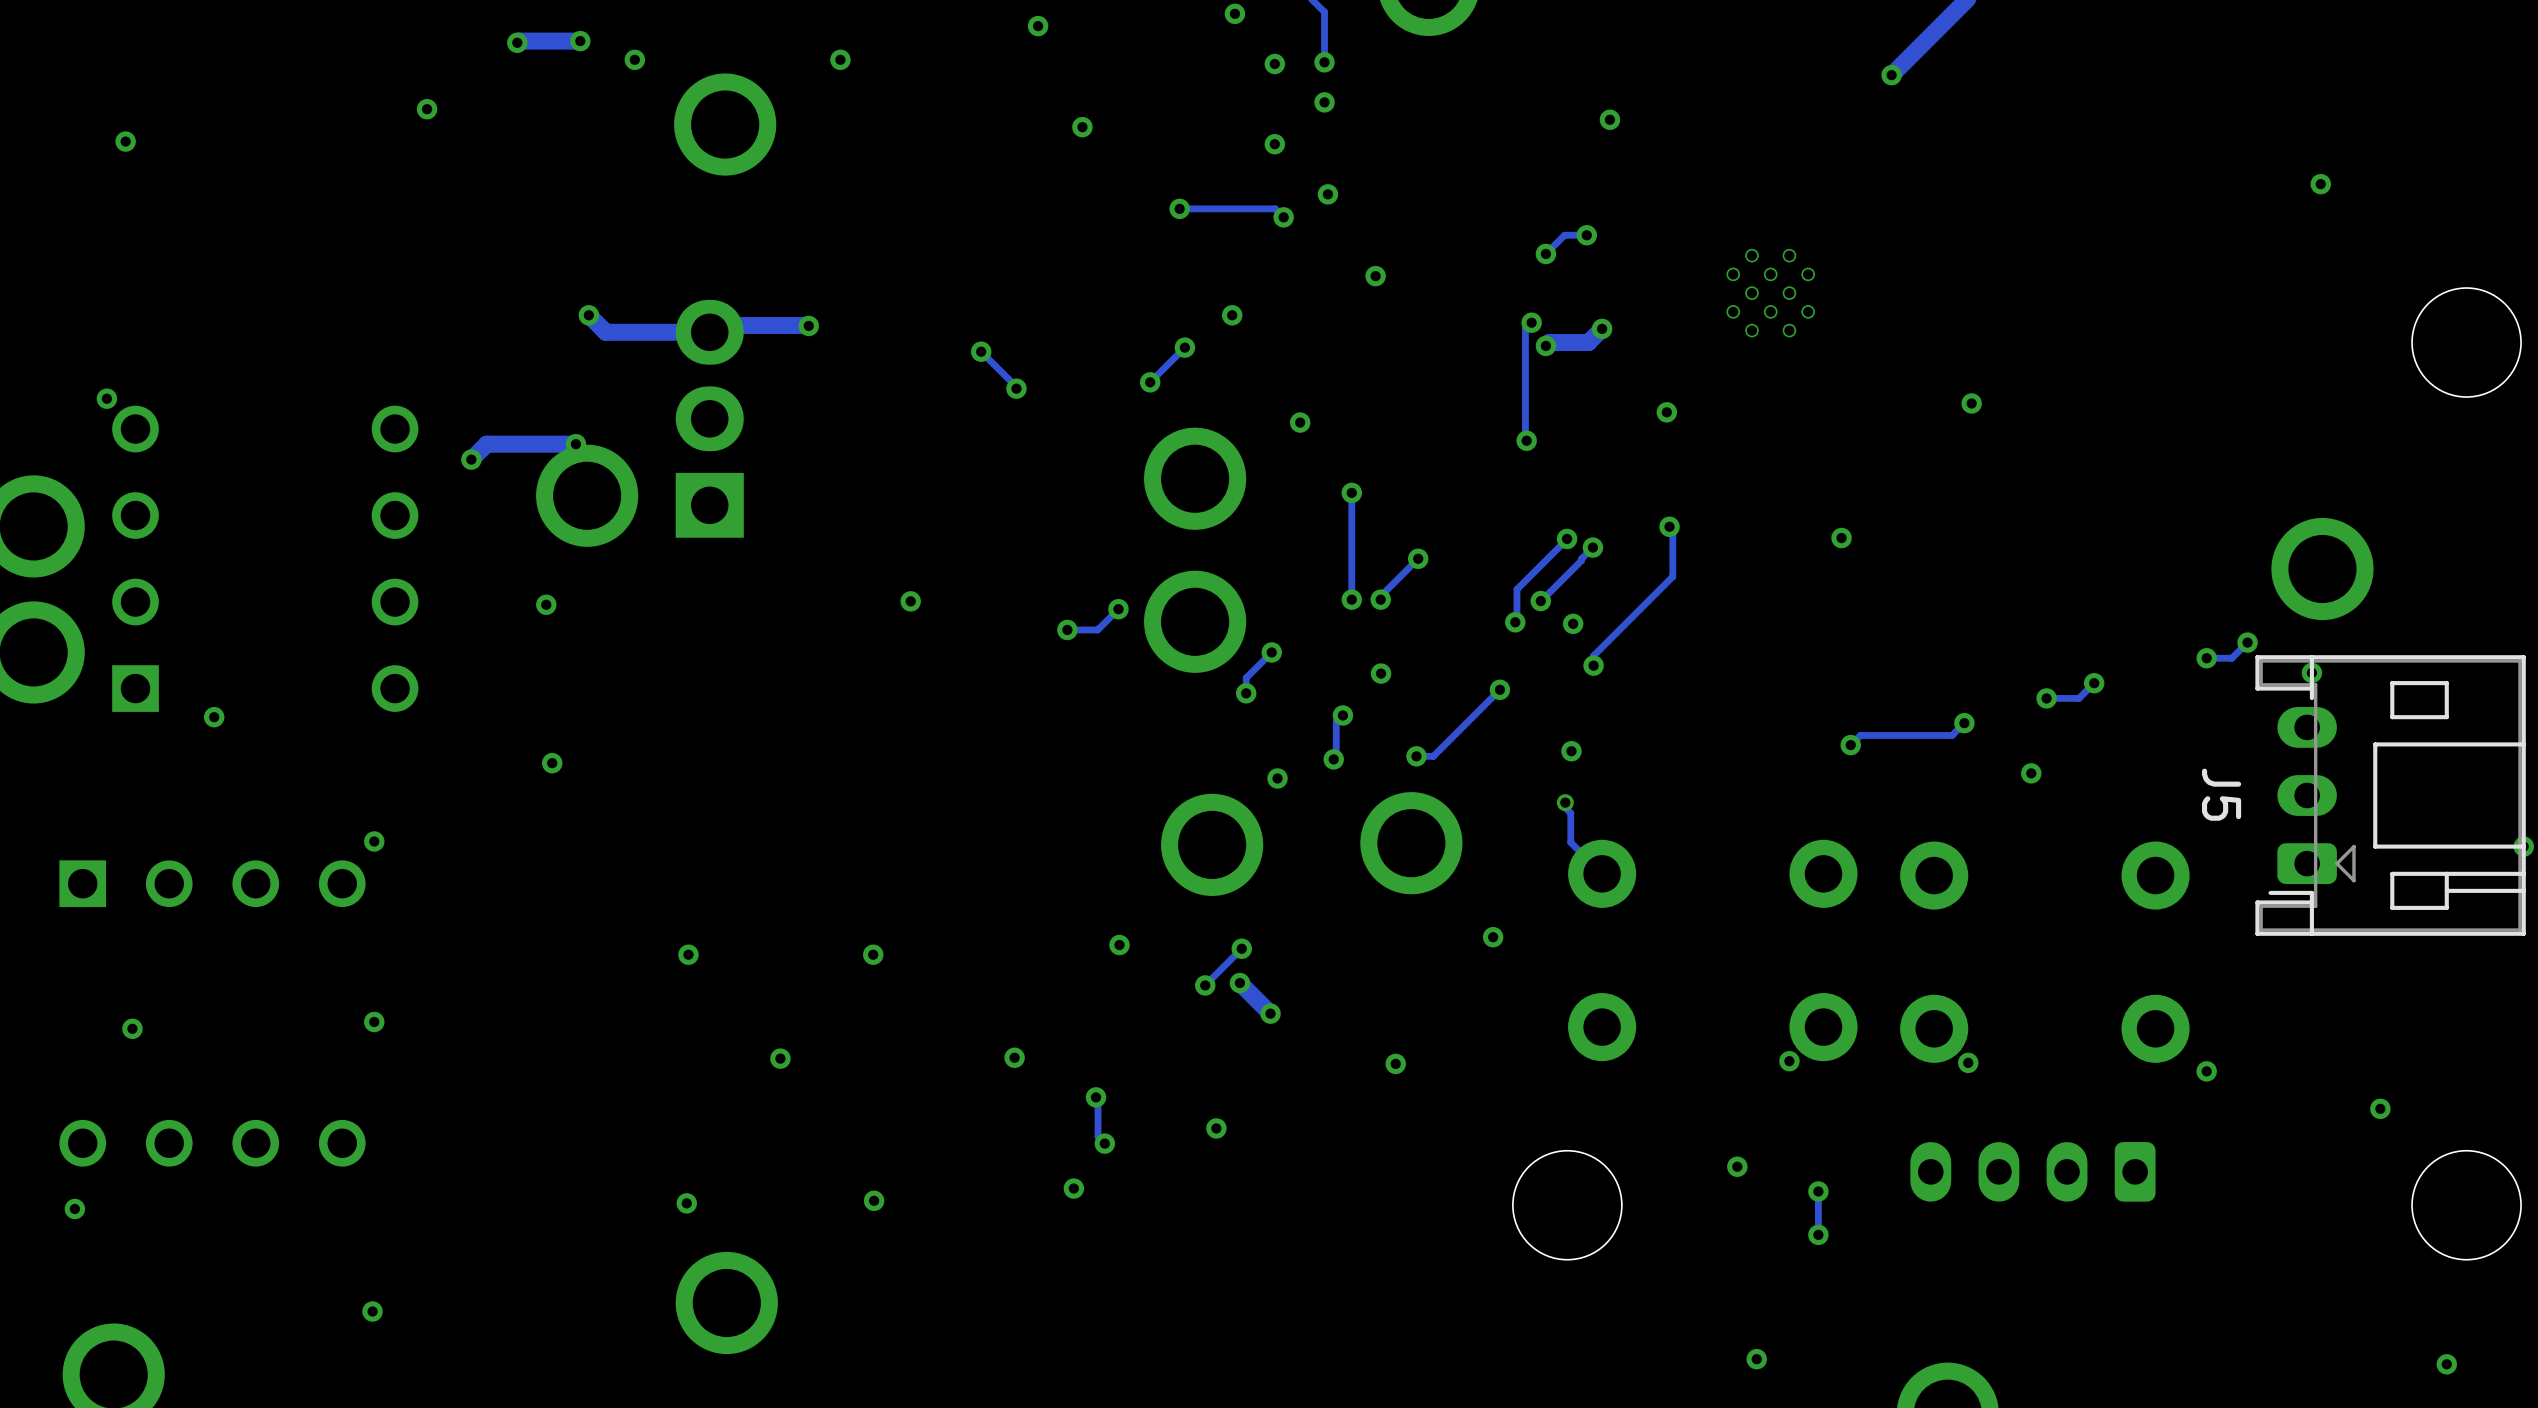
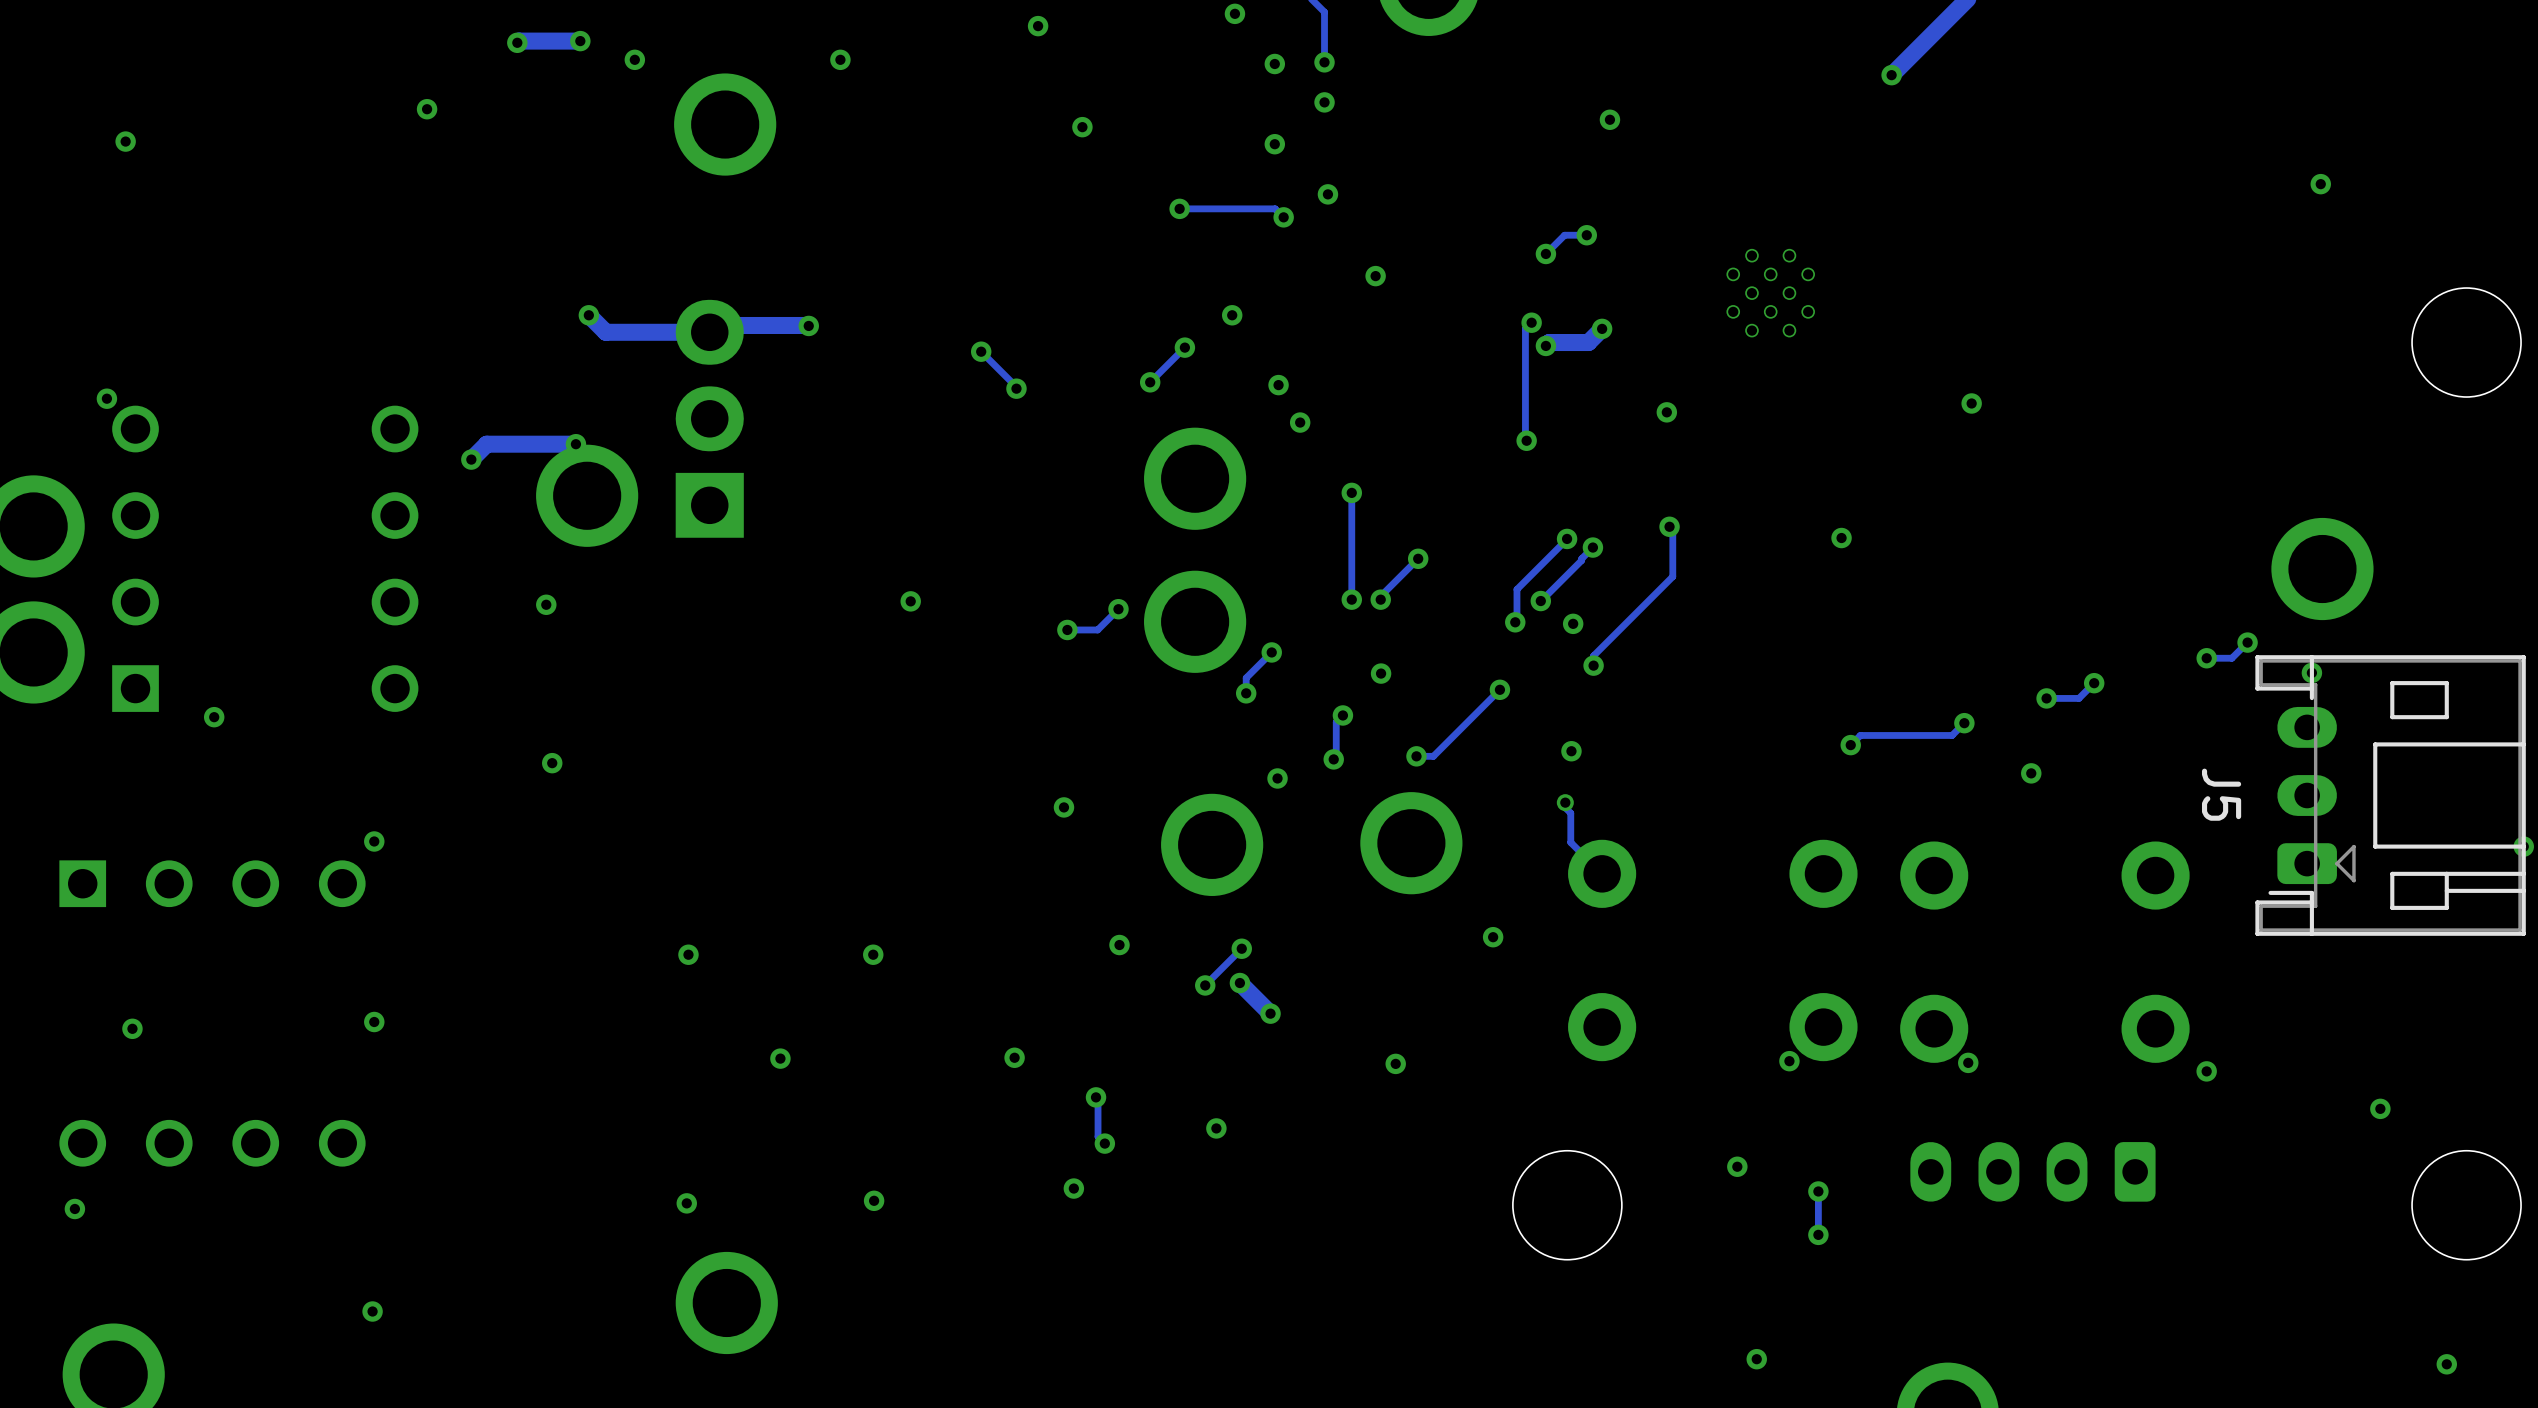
via: none -> (1278, 385)
via: none -> (1063, 807)

